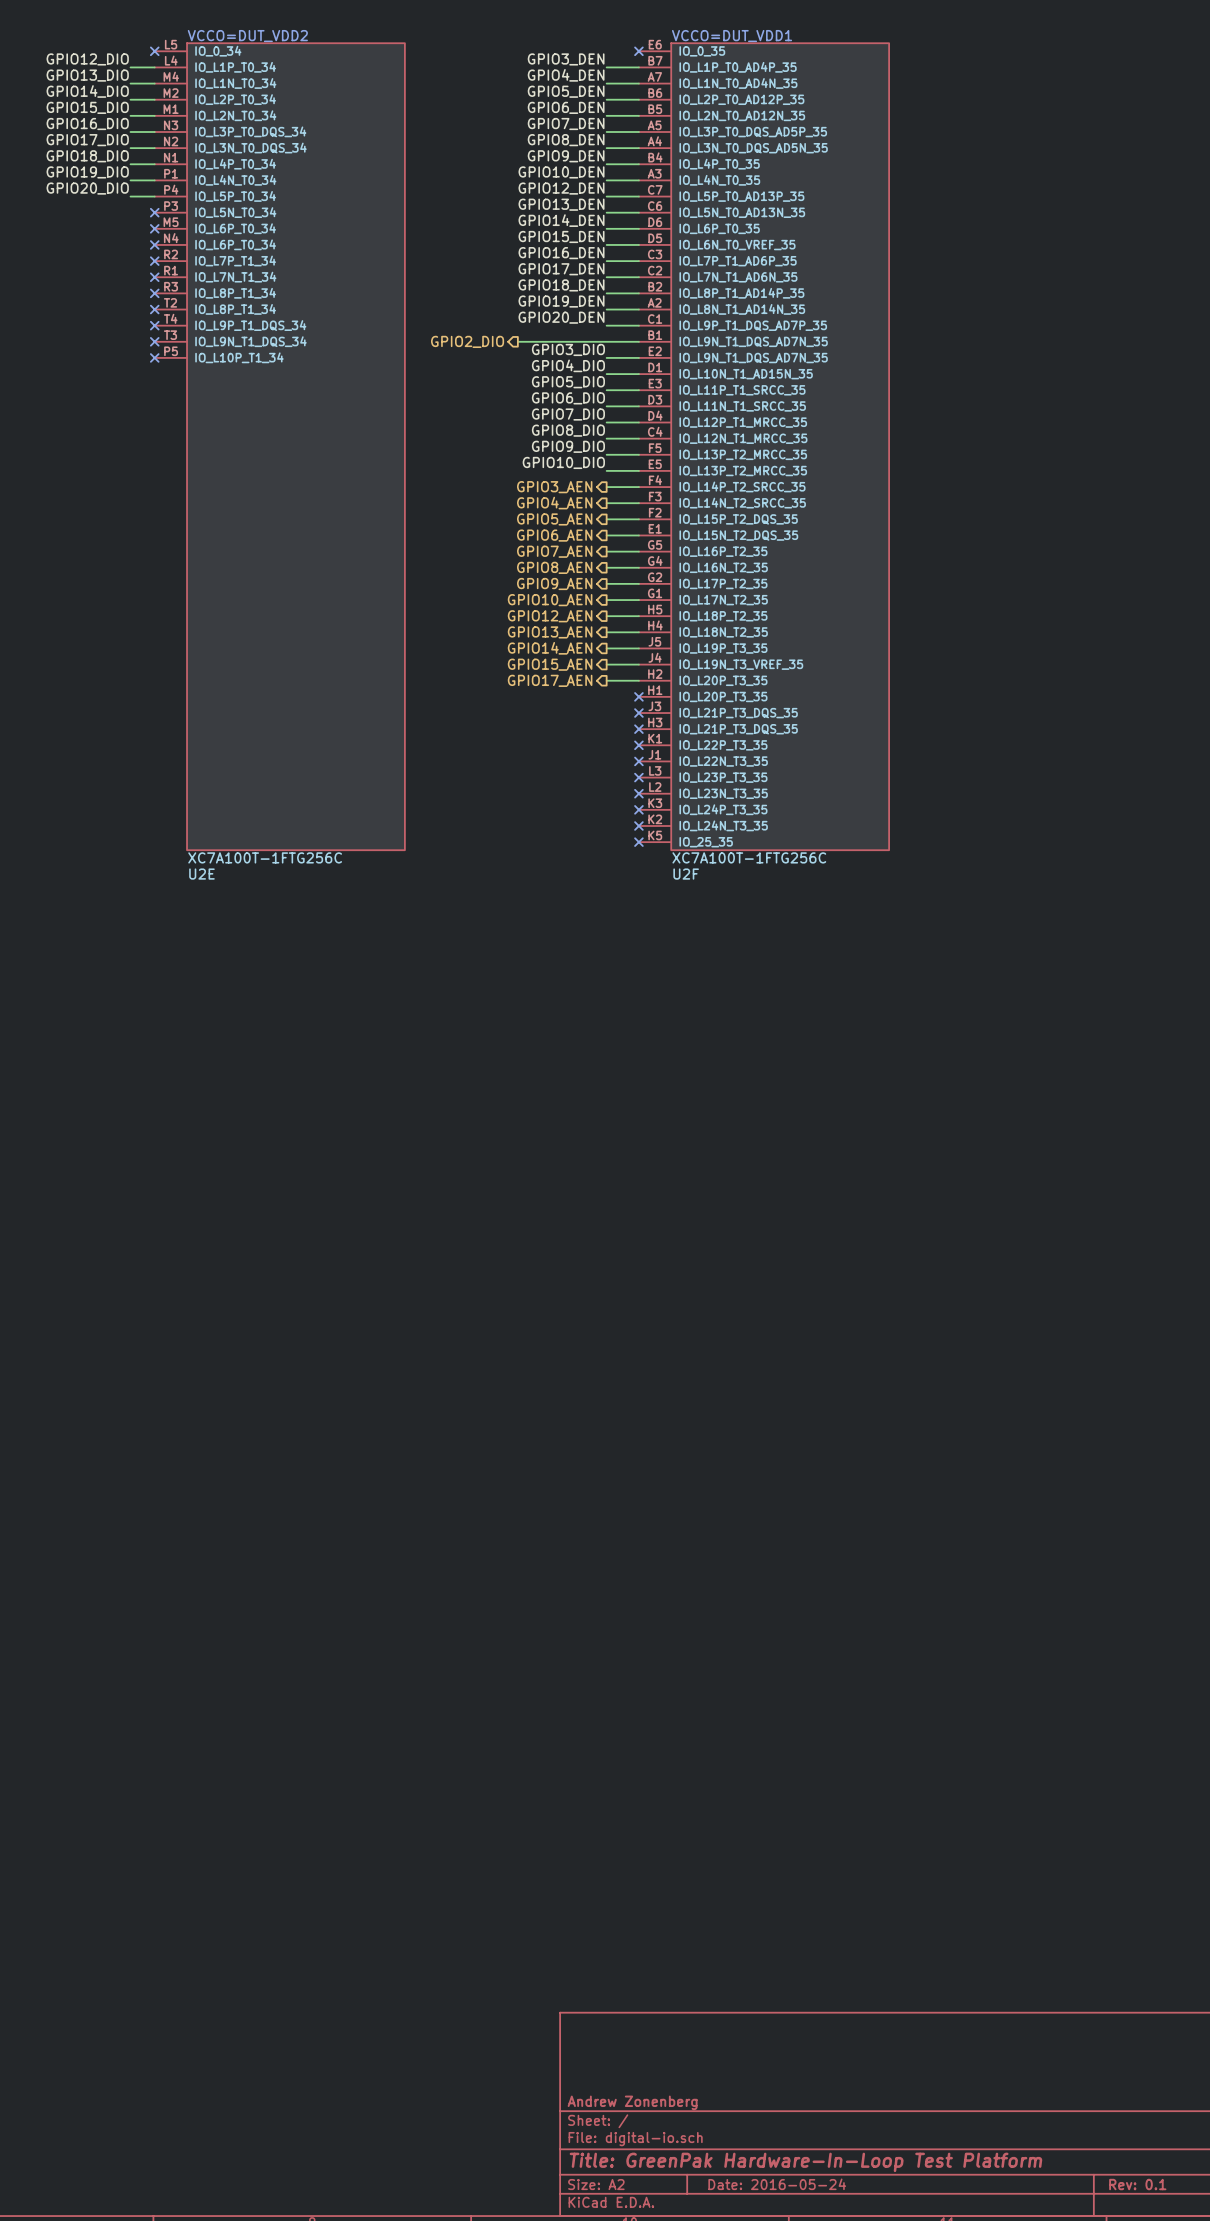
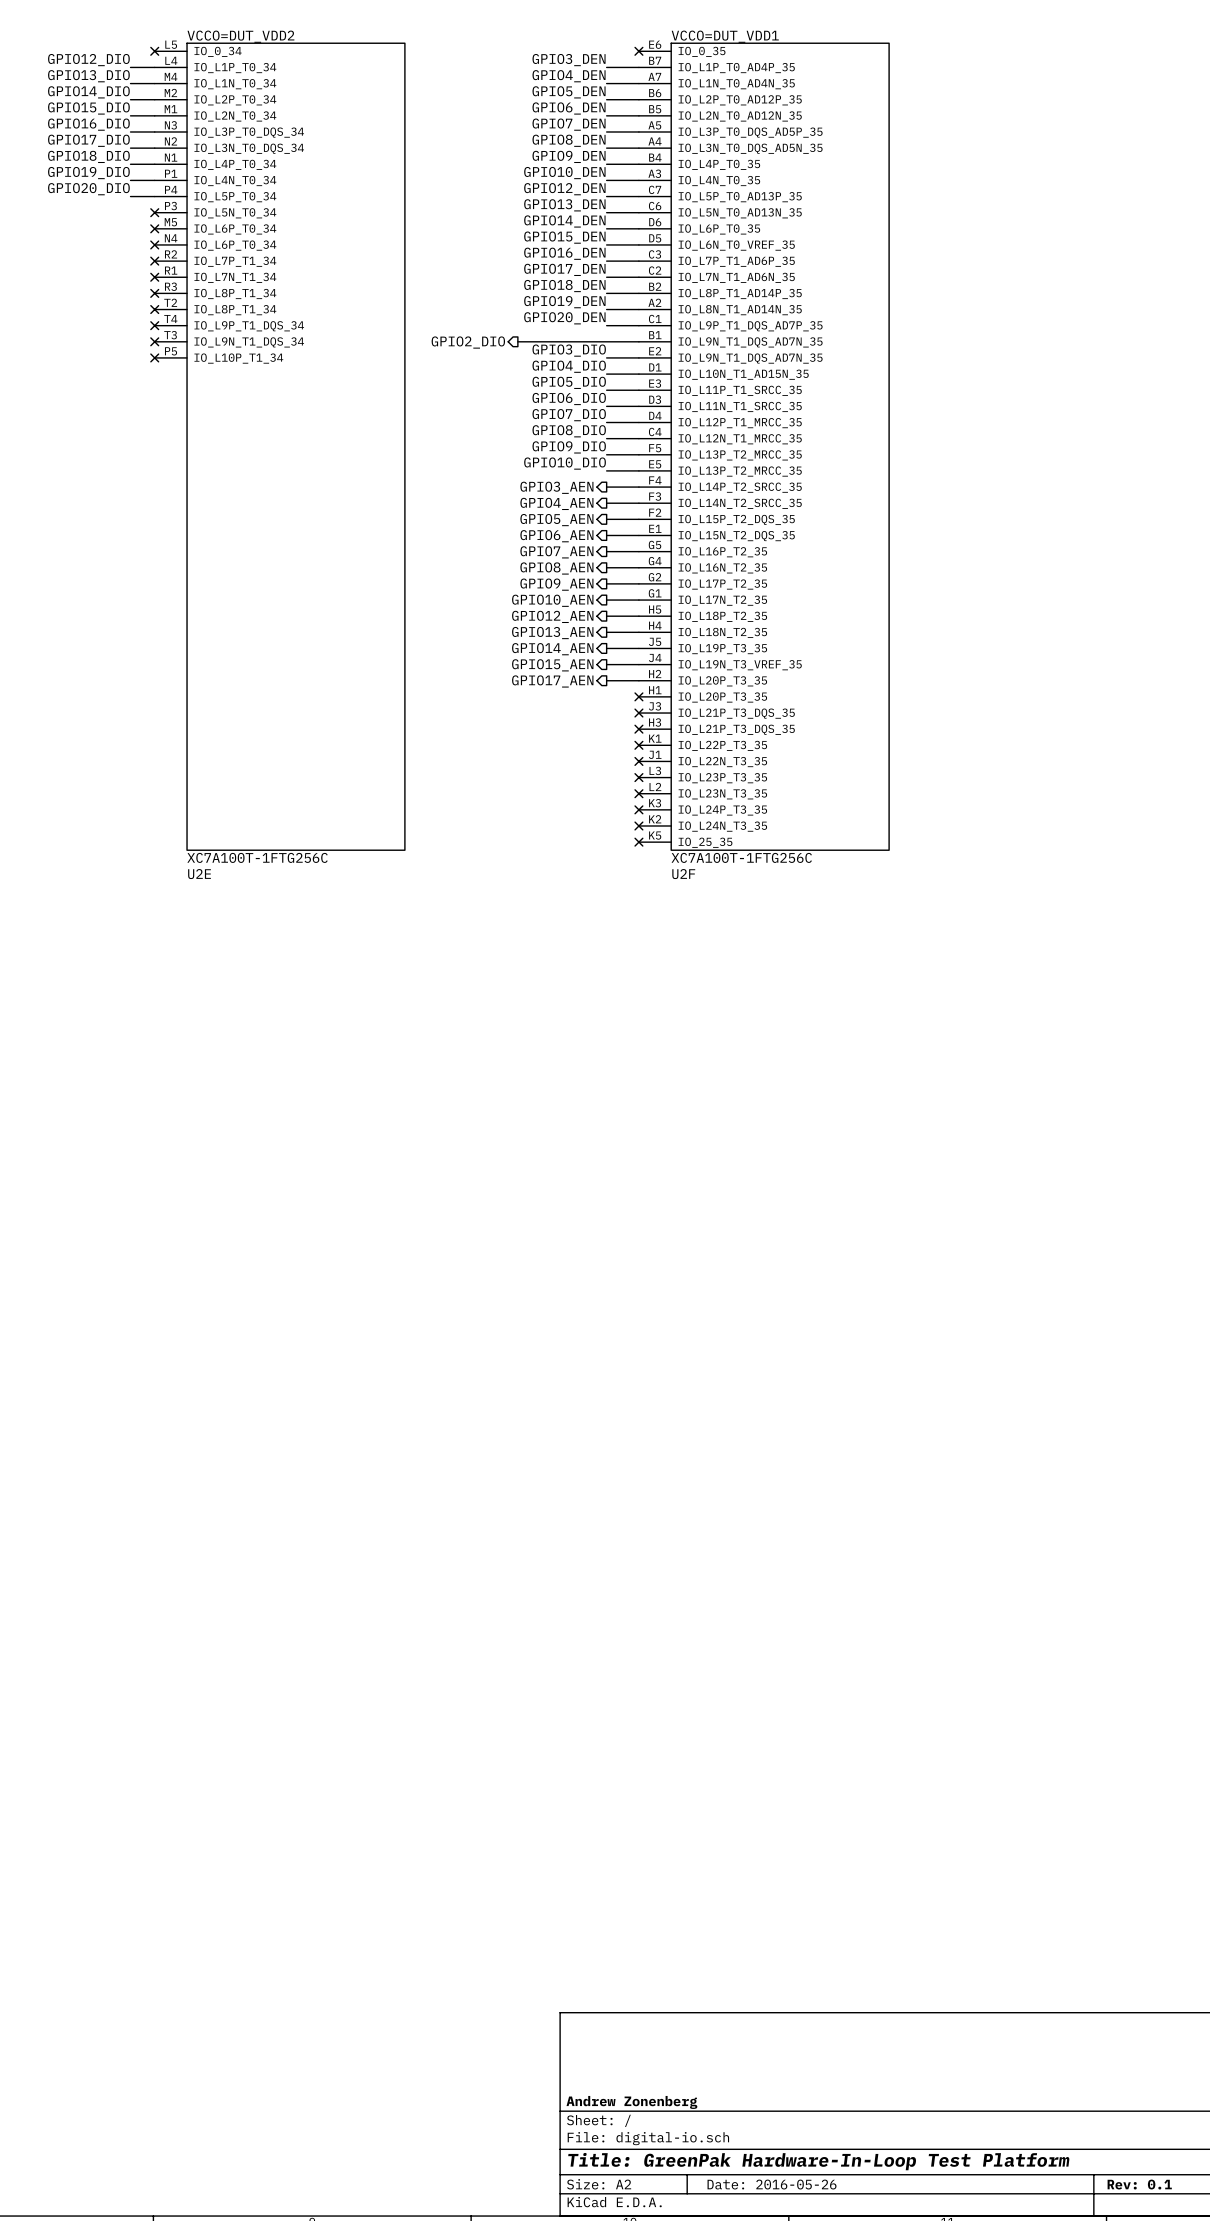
title block: Date: 2016-05-24 (777, 2184) -> Date: 2016-05-26 (772, 2184)

